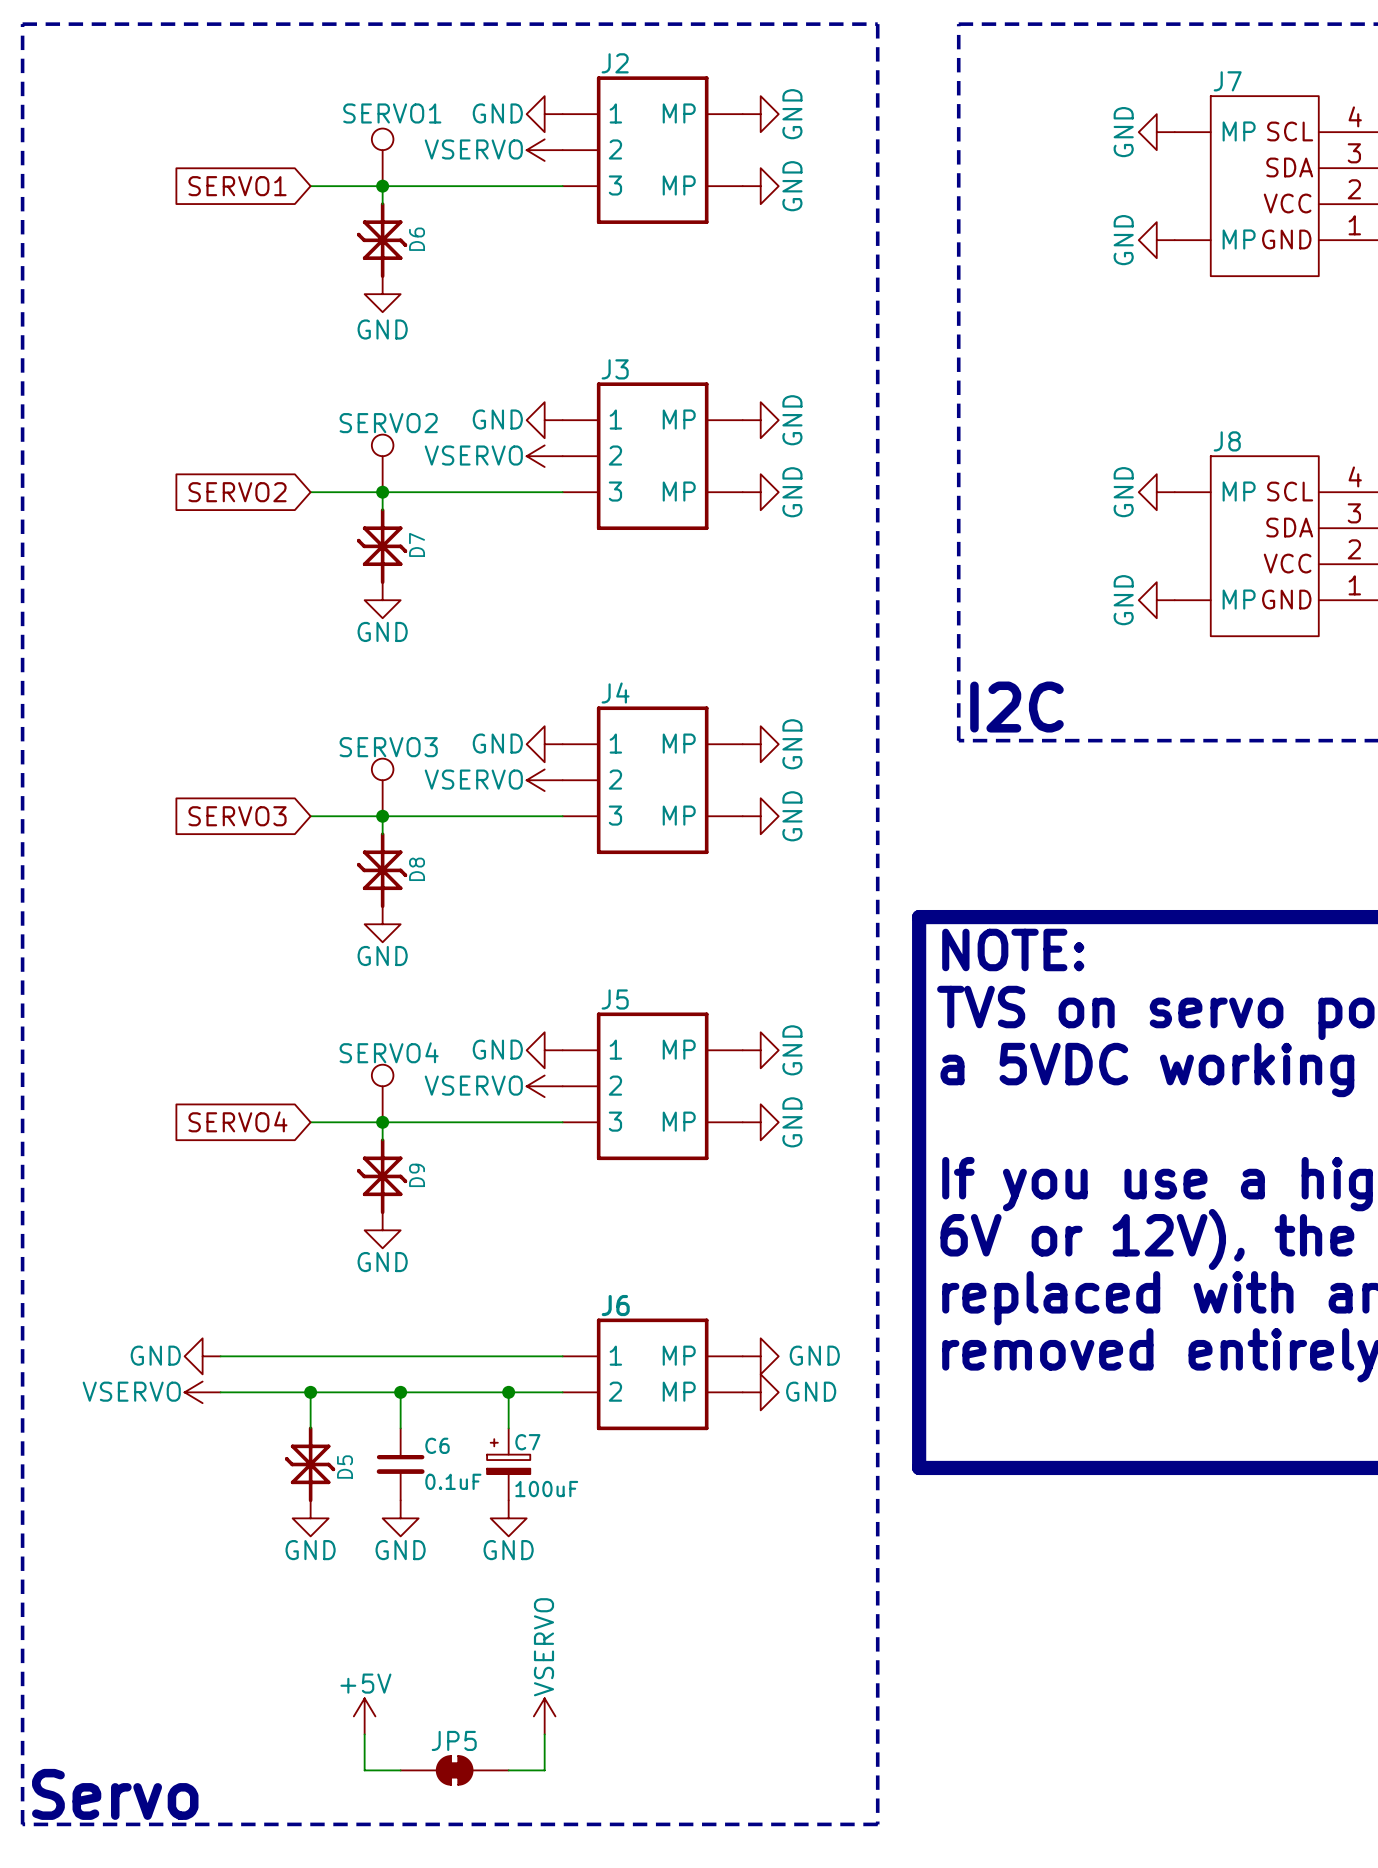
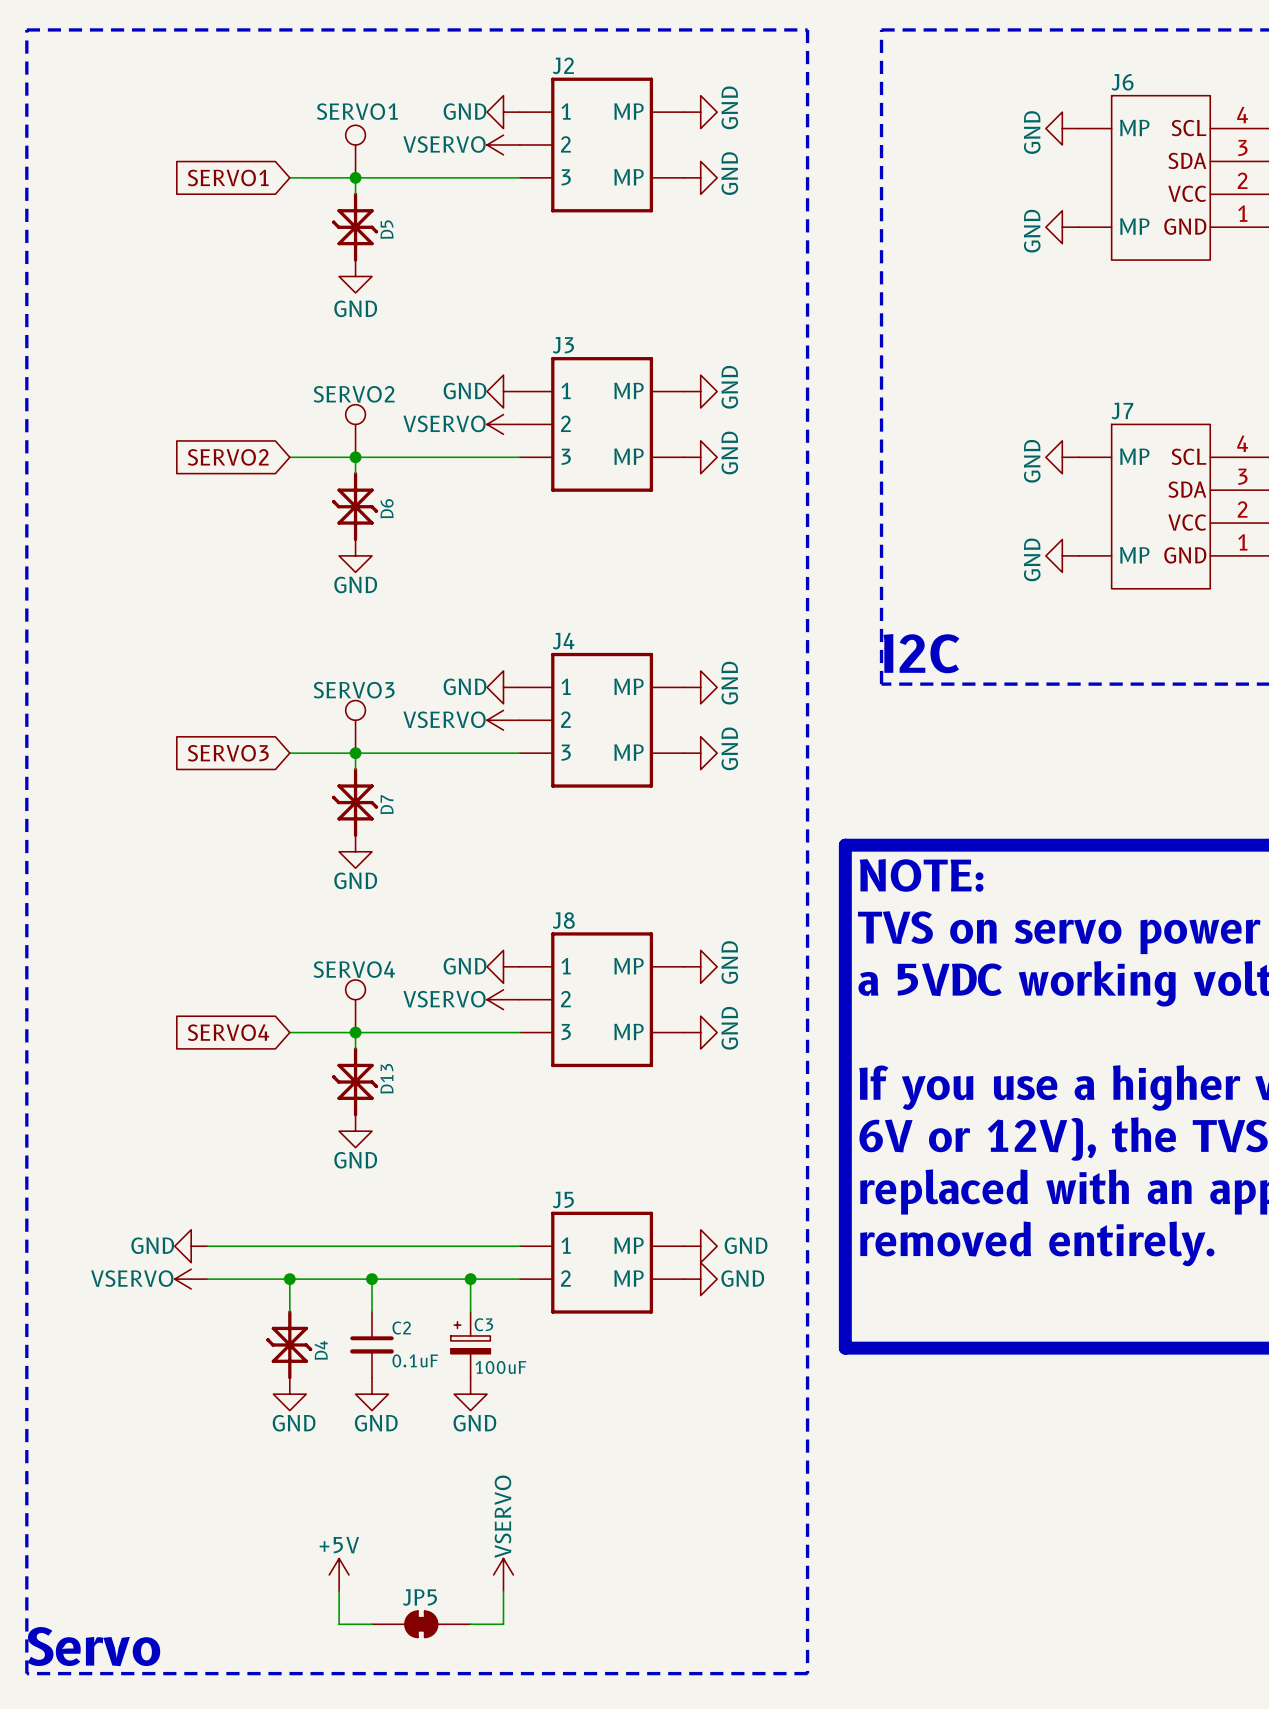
J7 name: J7 (1227, 81) -> J6 (1122, 82)
D6 name: D6 (417, 239) -> D5 (386, 229)
J8 name: J8 (1227, 441) -> J7 (1122, 410)
D7 name: D7 (417, 544) -> D6 (387, 508)
D8 name: D8 (417, 869) -> D7 (386, 804)
J5 name: J5 (615, 999) -> J8 (563, 920)
D9 name: D9 (417, 1175) -> D13 (386, 1078)
J6 name: J6 (615, 1305) -> J5 (563, 1199)
C7 name: C7 (527, 1442) -> C3 (483, 1324)
C6 name: C6 (437, 1445) -> C2 (401, 1328)
D5 name: D5 (345, 1467) -> D4 (321, 1350)

